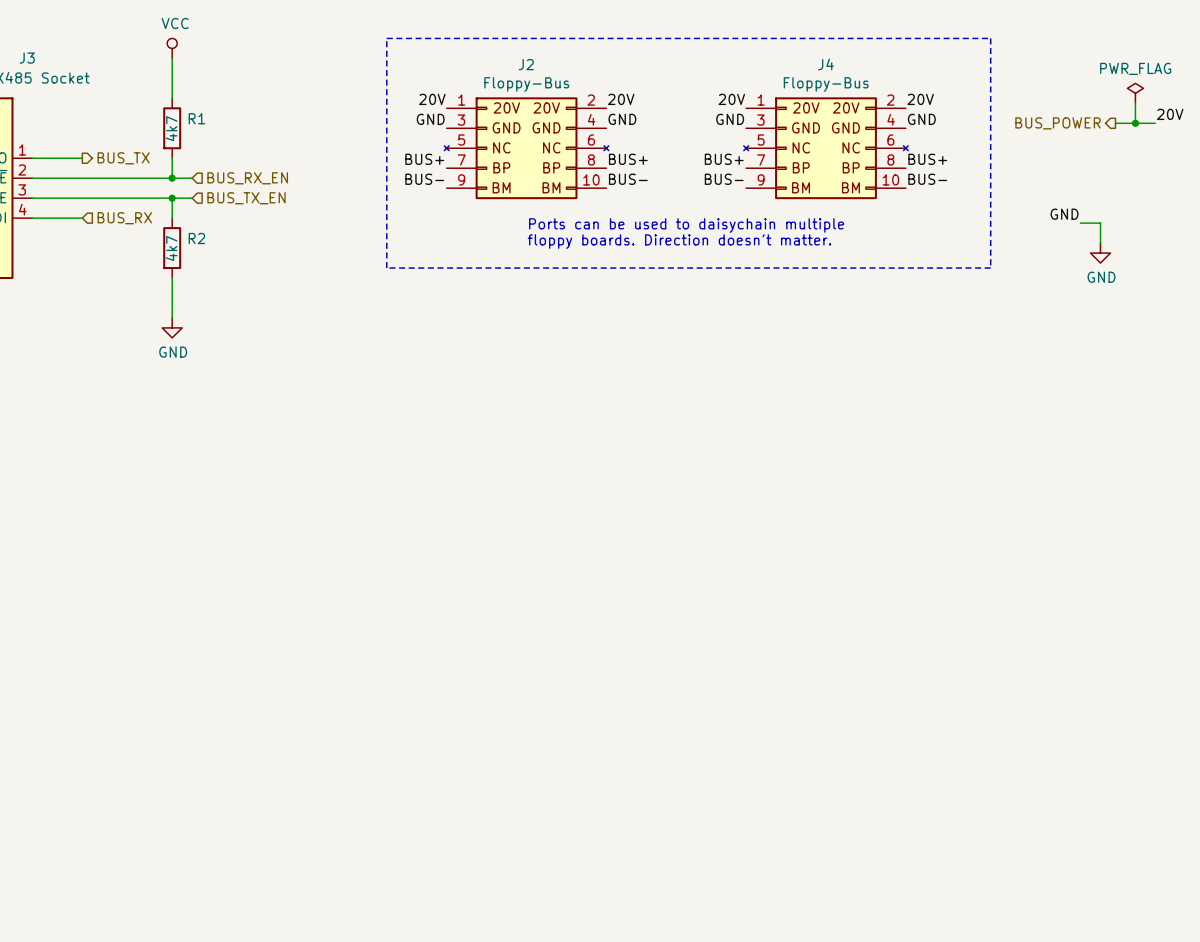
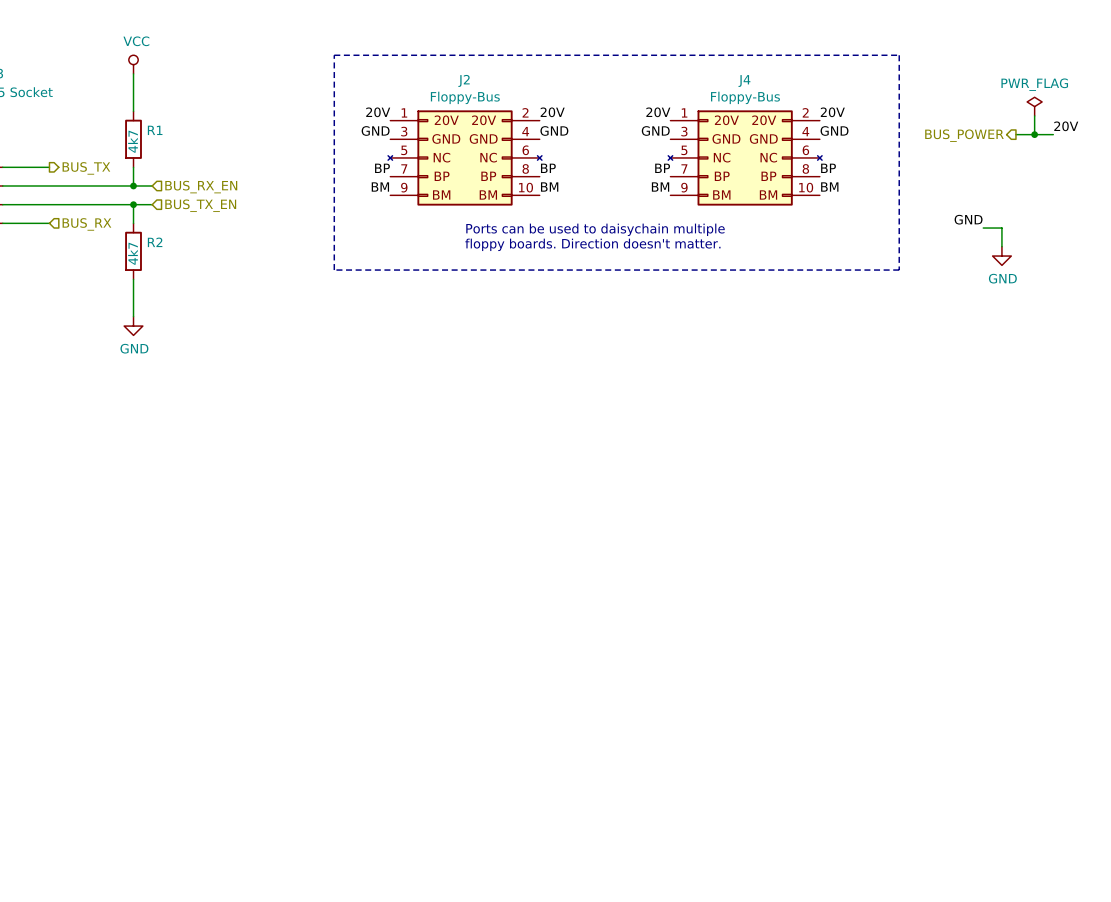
label: BUS+ (424, 159) -> BP (382, 168)
label: BUS+ (628, 159) -> BP (548, 168)
label: BUS+ (724, 159) -> BP (662, 168)
label: BUS+ (927, 159) -> BP (828, 168)
label: BUS- (424, 179) -> BM (380, 187)
label: BUS- (628, 179) -> BM (549, 187)
label: BUS- (724, 179) -> BM (660, 187)
label: BUS- (927, 179) -> BM (829, 187)

